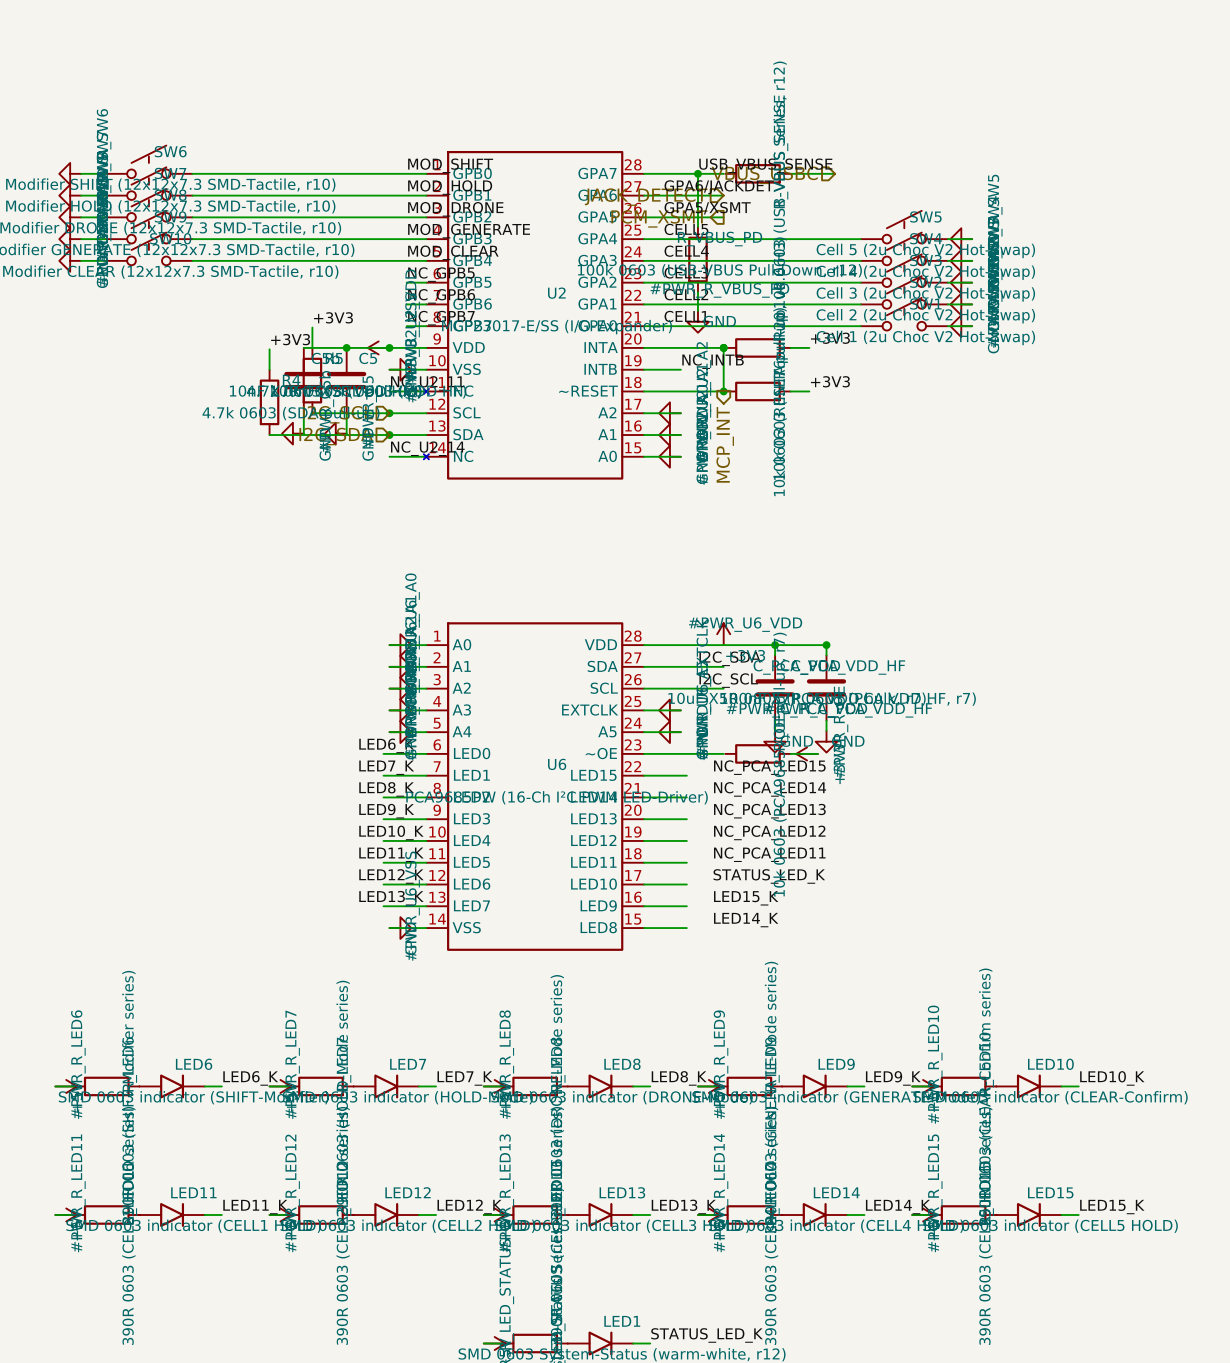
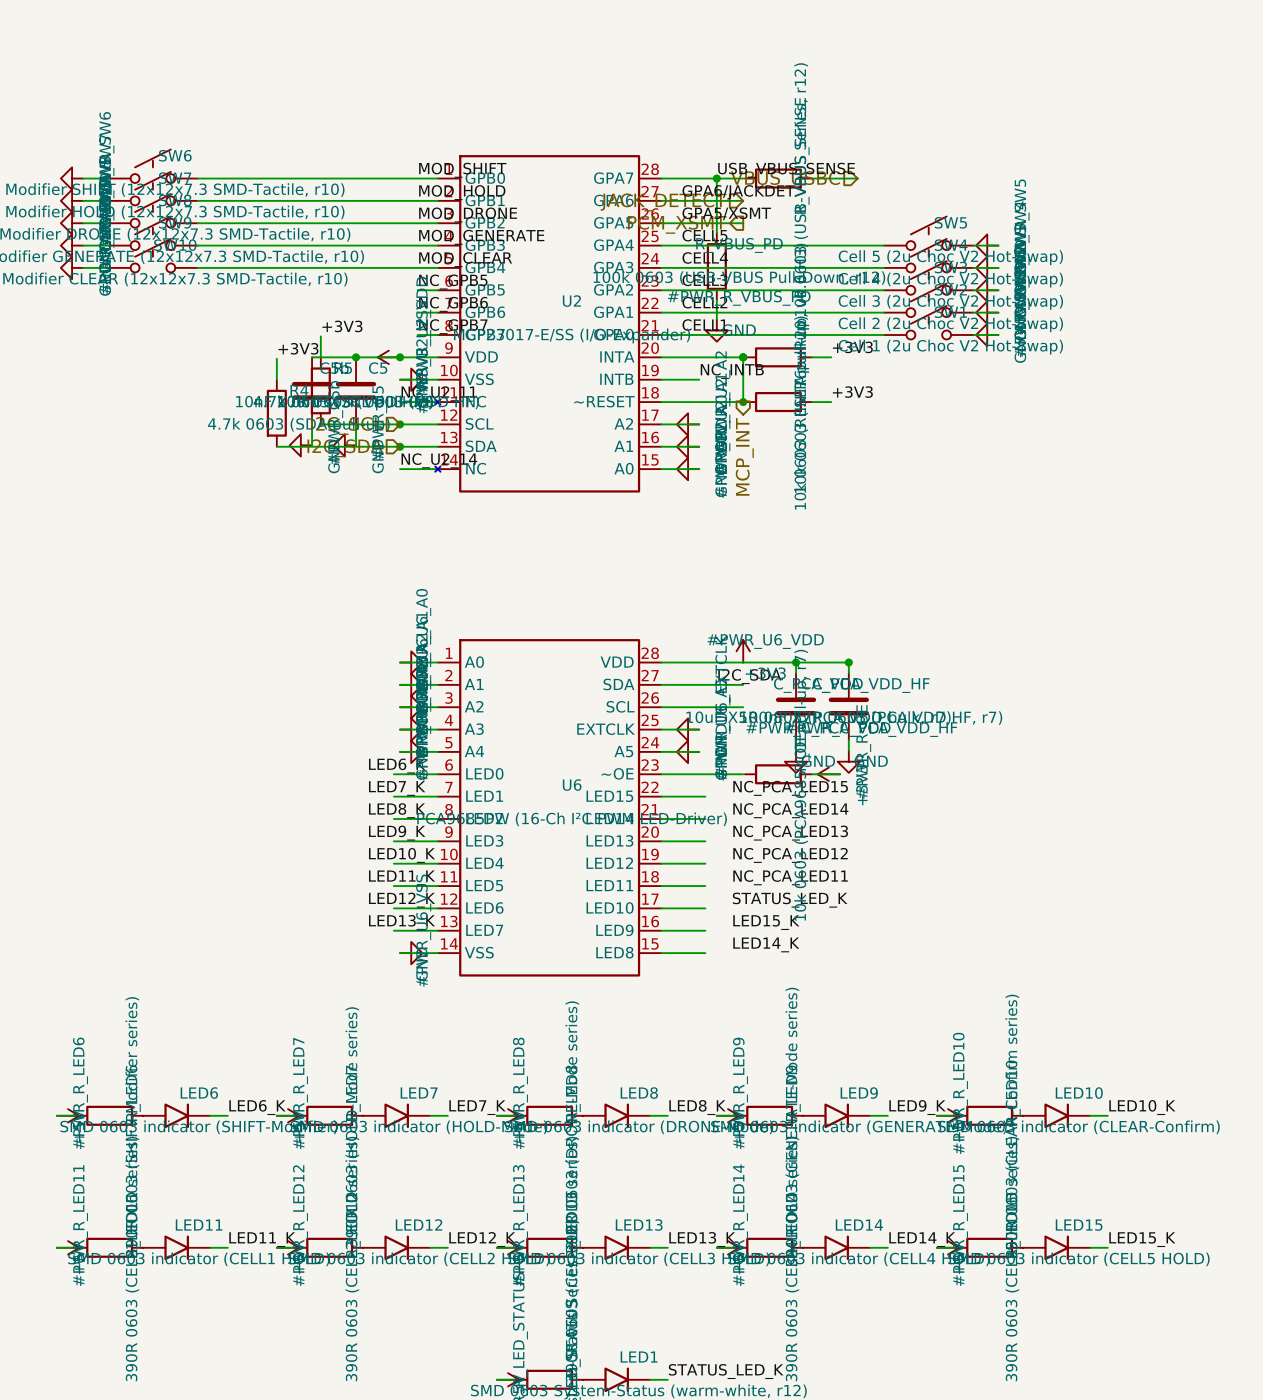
label: I2C_SCL (728, 680) -> none

